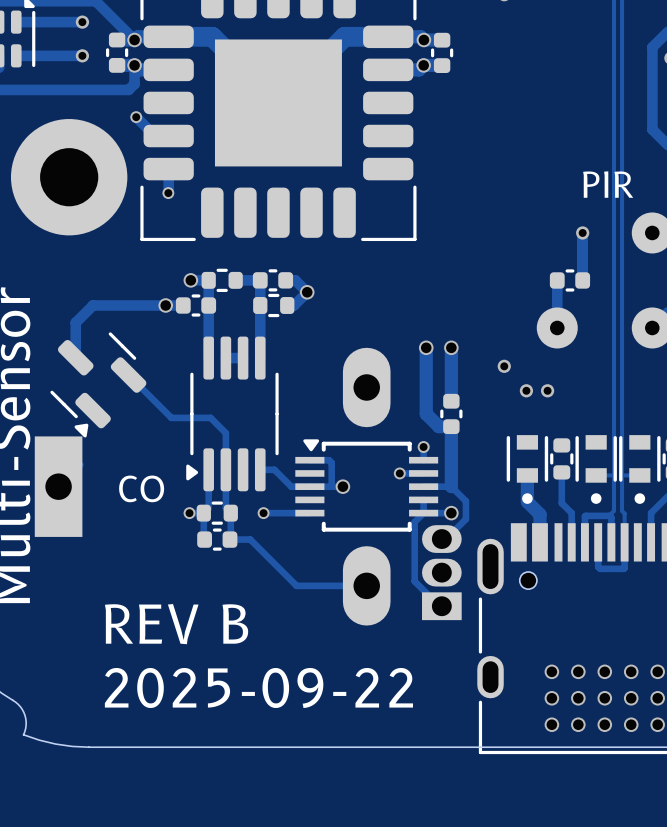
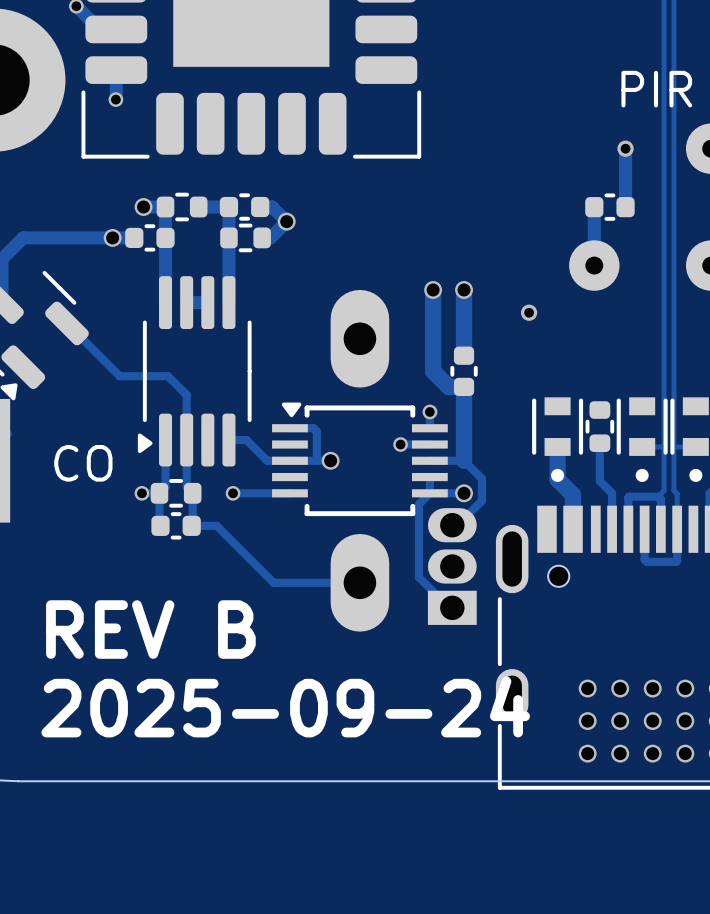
via: (526, 390) -> none
via: (547, 390) -> none
text: 2025-09-22 (258, 687) -> 2025-09-24 (285, 706)

